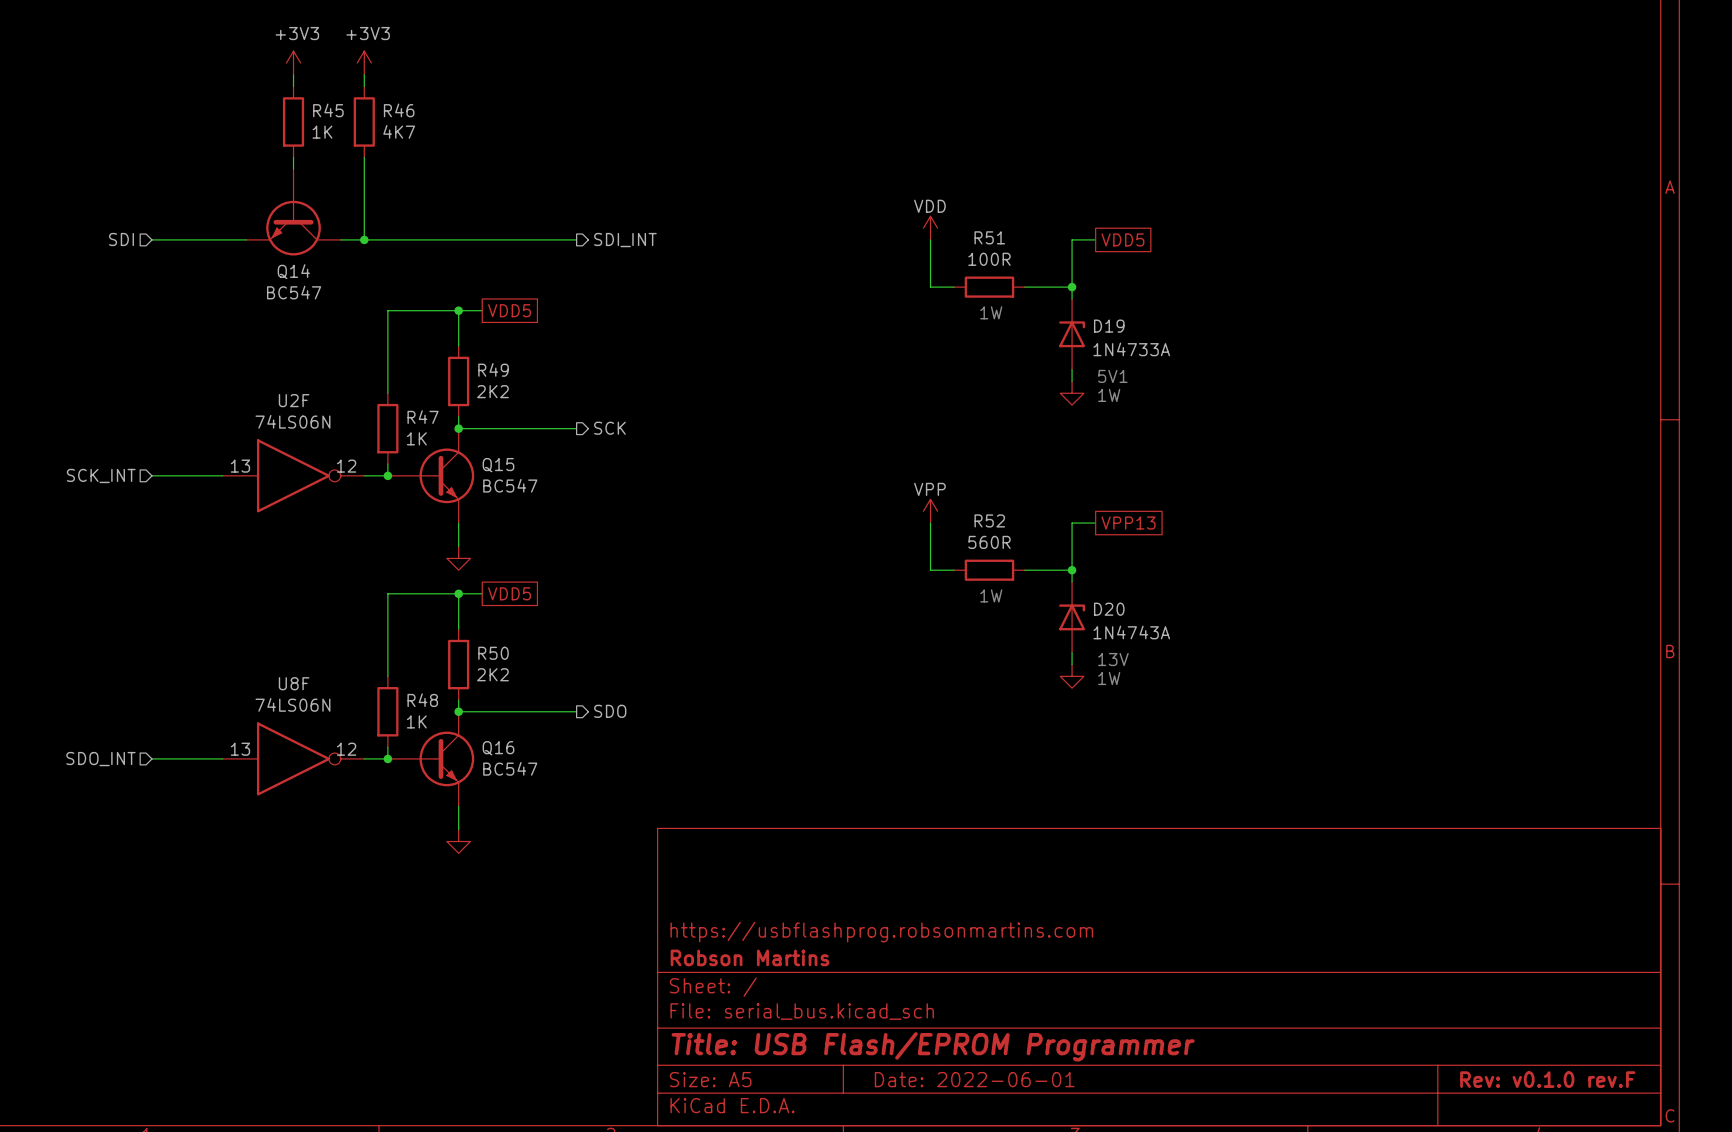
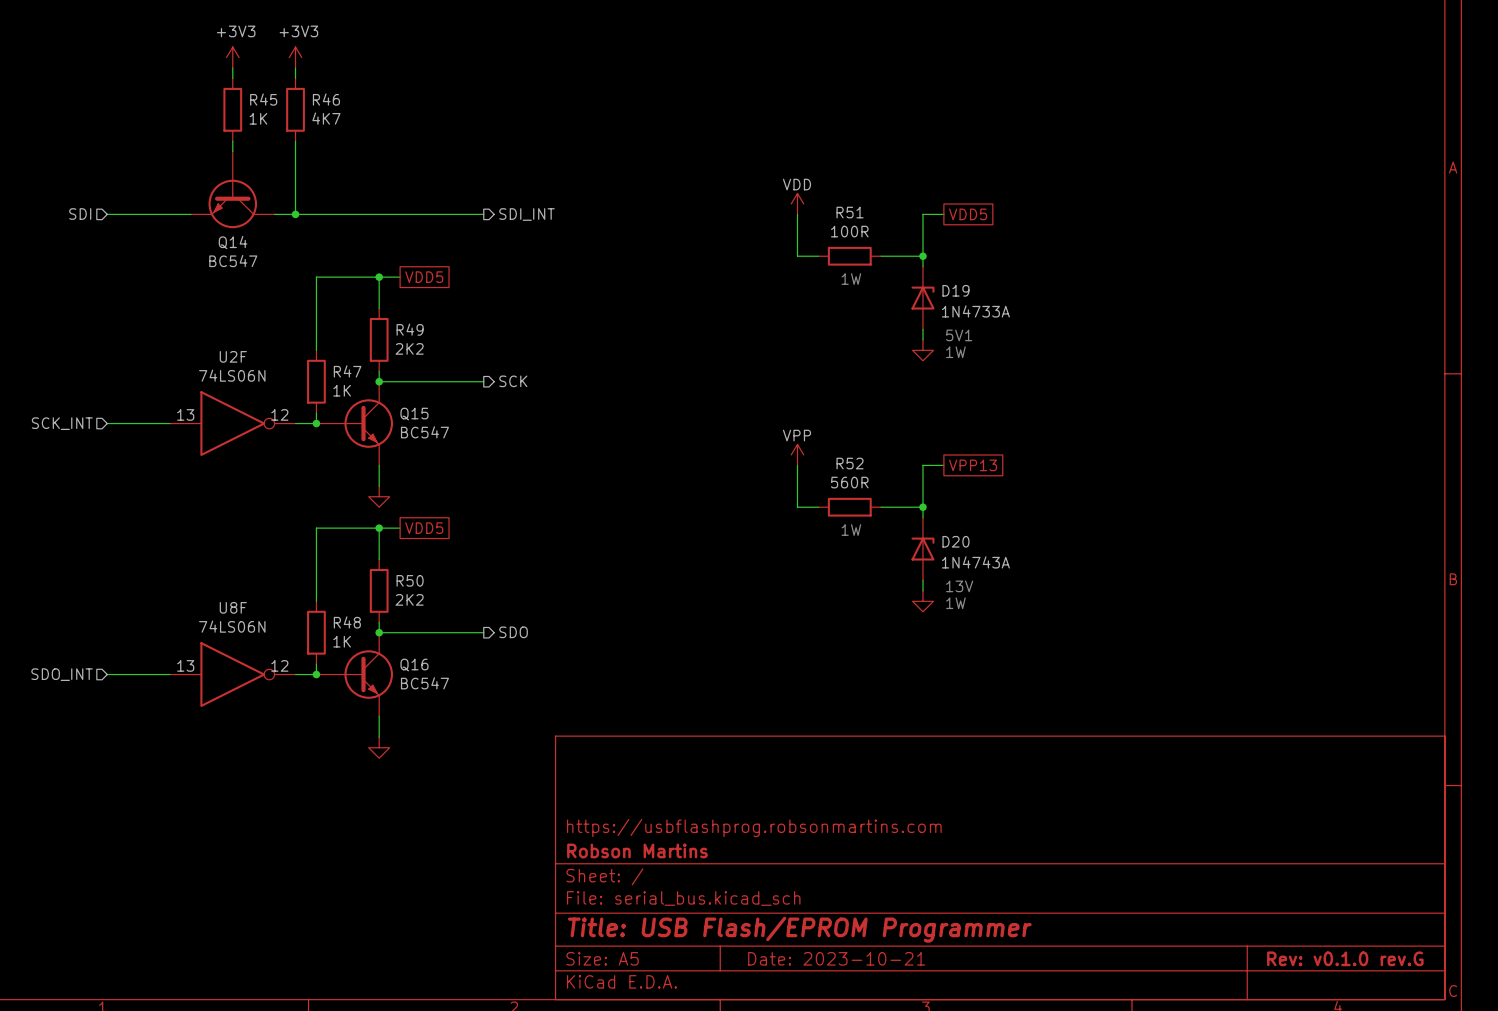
title block: Date: 2022-06-01 (974, 1079) -> Date: 2023-10-21 (836, 958)
title block: Rev: v0.1.0 rev.F (1547, 1079) -> Rev: v0.1.0 rev.G (1345, 958)

